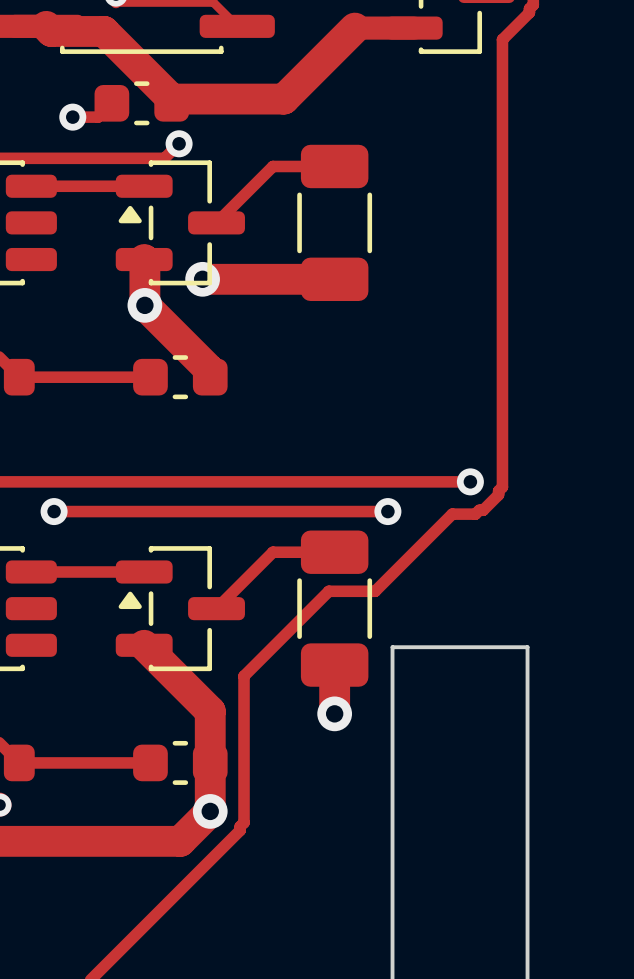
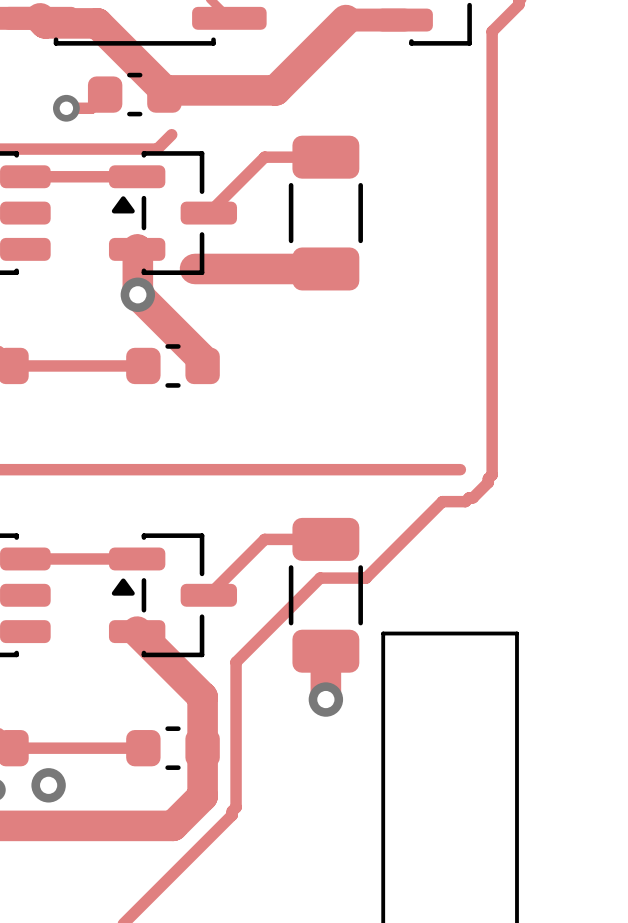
via: (179, 143) -> none
via: (202, 279) -> none
via: (470, 481) -> none
track: (54, 511) (387, 511) -> none
via: (54, 511) -> none
via: (387, 511) -> none
via position: (210, 811) -> (48, 785)

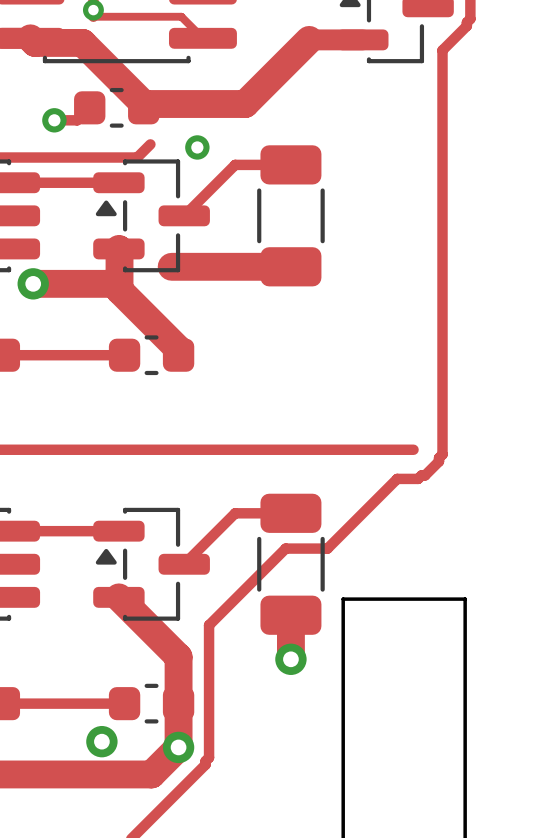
via: none -> (197, 147)
track: none -> (33, 283) (118, 283)
via position: (137, 294) -> (33, 283)
via position: (48, 785) -> (101, 741)
via: none -> (178, 747)

